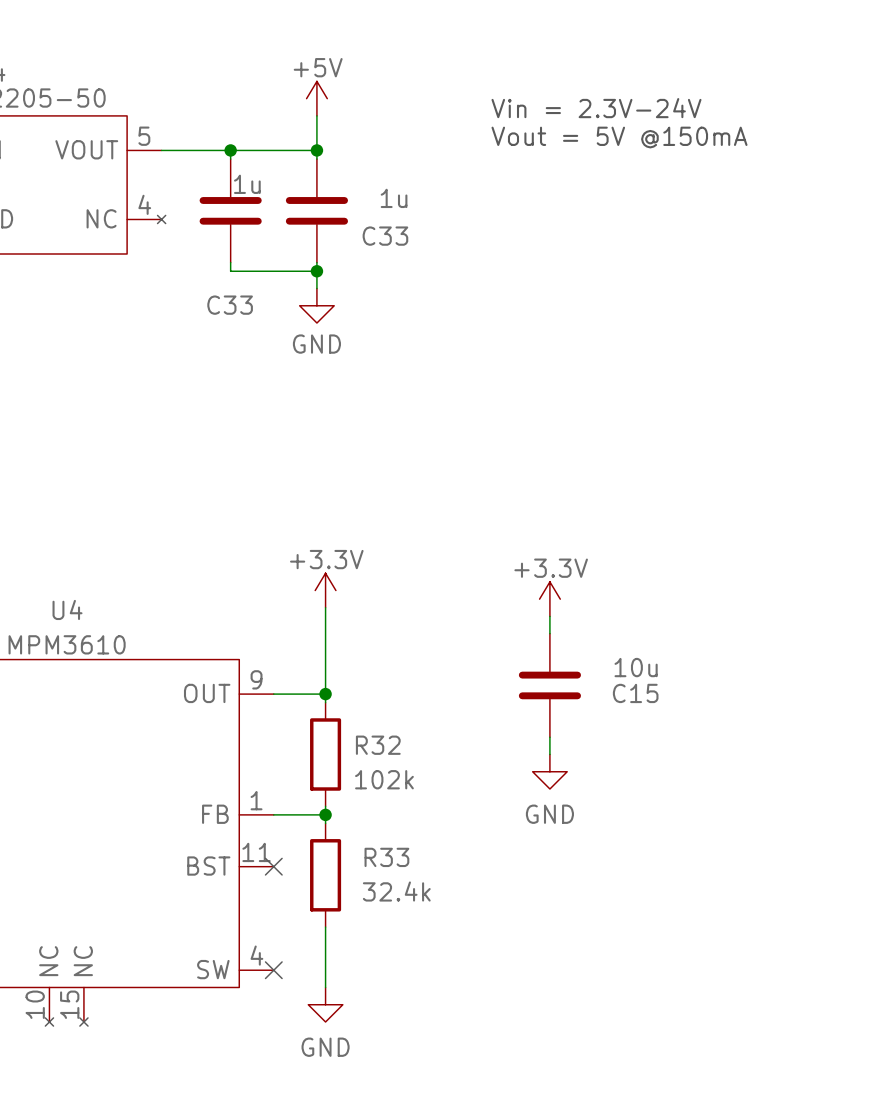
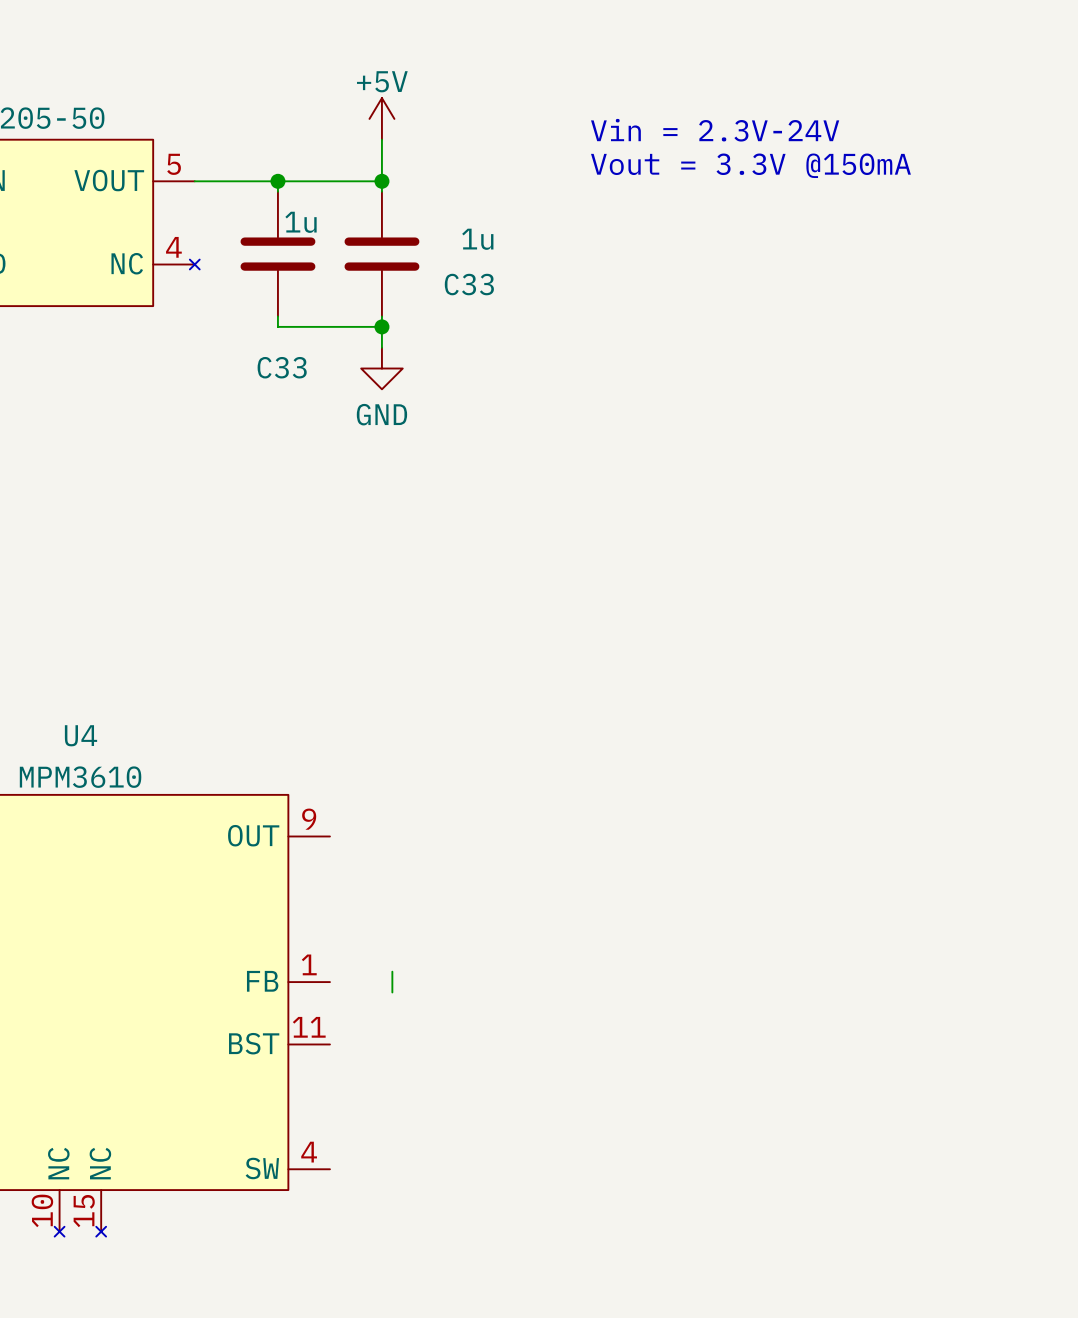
text: Vout = 5V @150mA (619, 137) -> Vout = 3.3V @150mA (750, 165)
power symbol: +3.3V (325, 590) -> none
power symbol: +3.3V (549, 599) -> none
wire: (325, 607) (325, 702) -> none
wire: (549, 616) (549, 633) -> none
C15: 10u (549, 685) -> none
wire: (273, 694) (325, 694) -> none
junction: (325, 694) -> none
wire: (549, 737) (549, 754) -> none
R32: 102k (325, 754) -> none
power symbol: GND (549, 771) -> none
wire: (273, 814) (325, 814) -> none
junction: (325, 814) -> none
no-connect mark: (273, 866) -> none
R33: 32.4k (325, 875) -> none
wire: (325, 927) (325, 987) -> none
no-connect mark: (273, 970) -> none
power symbol: GND (325, 1004) -> none

